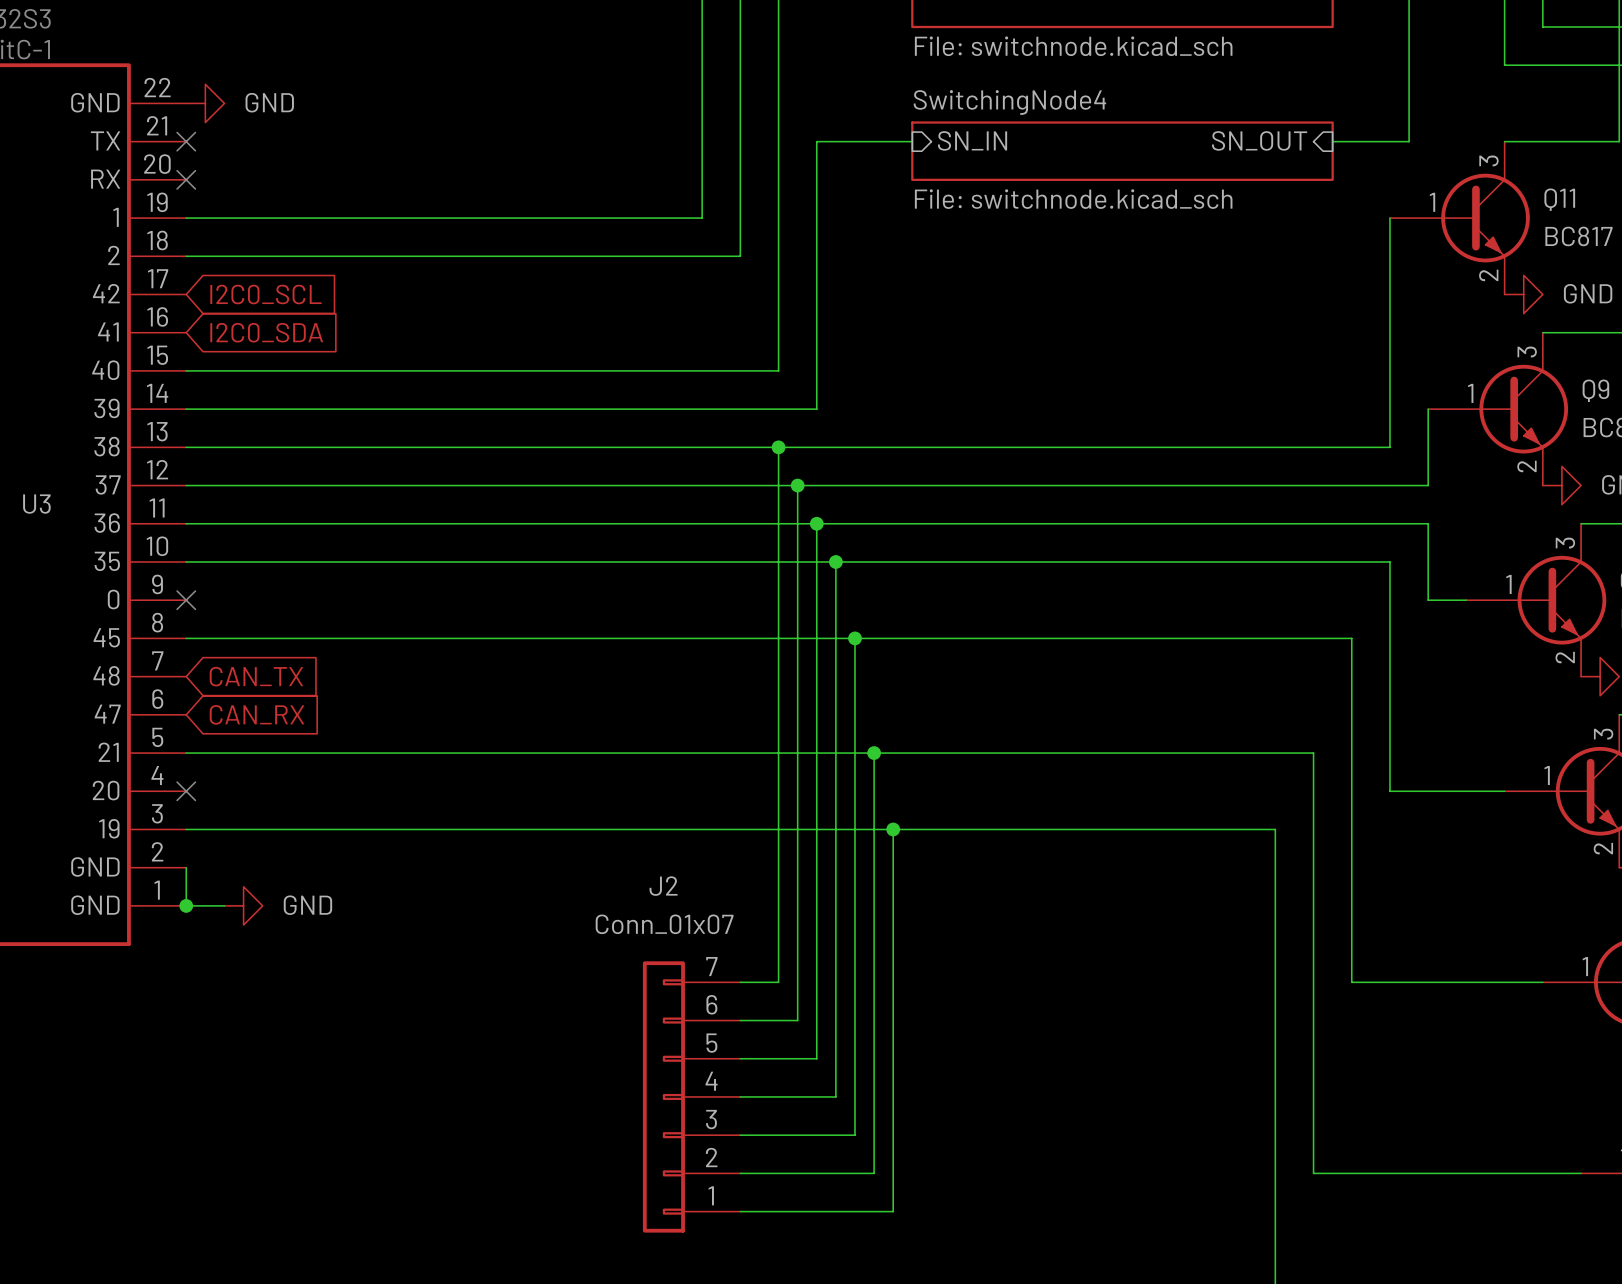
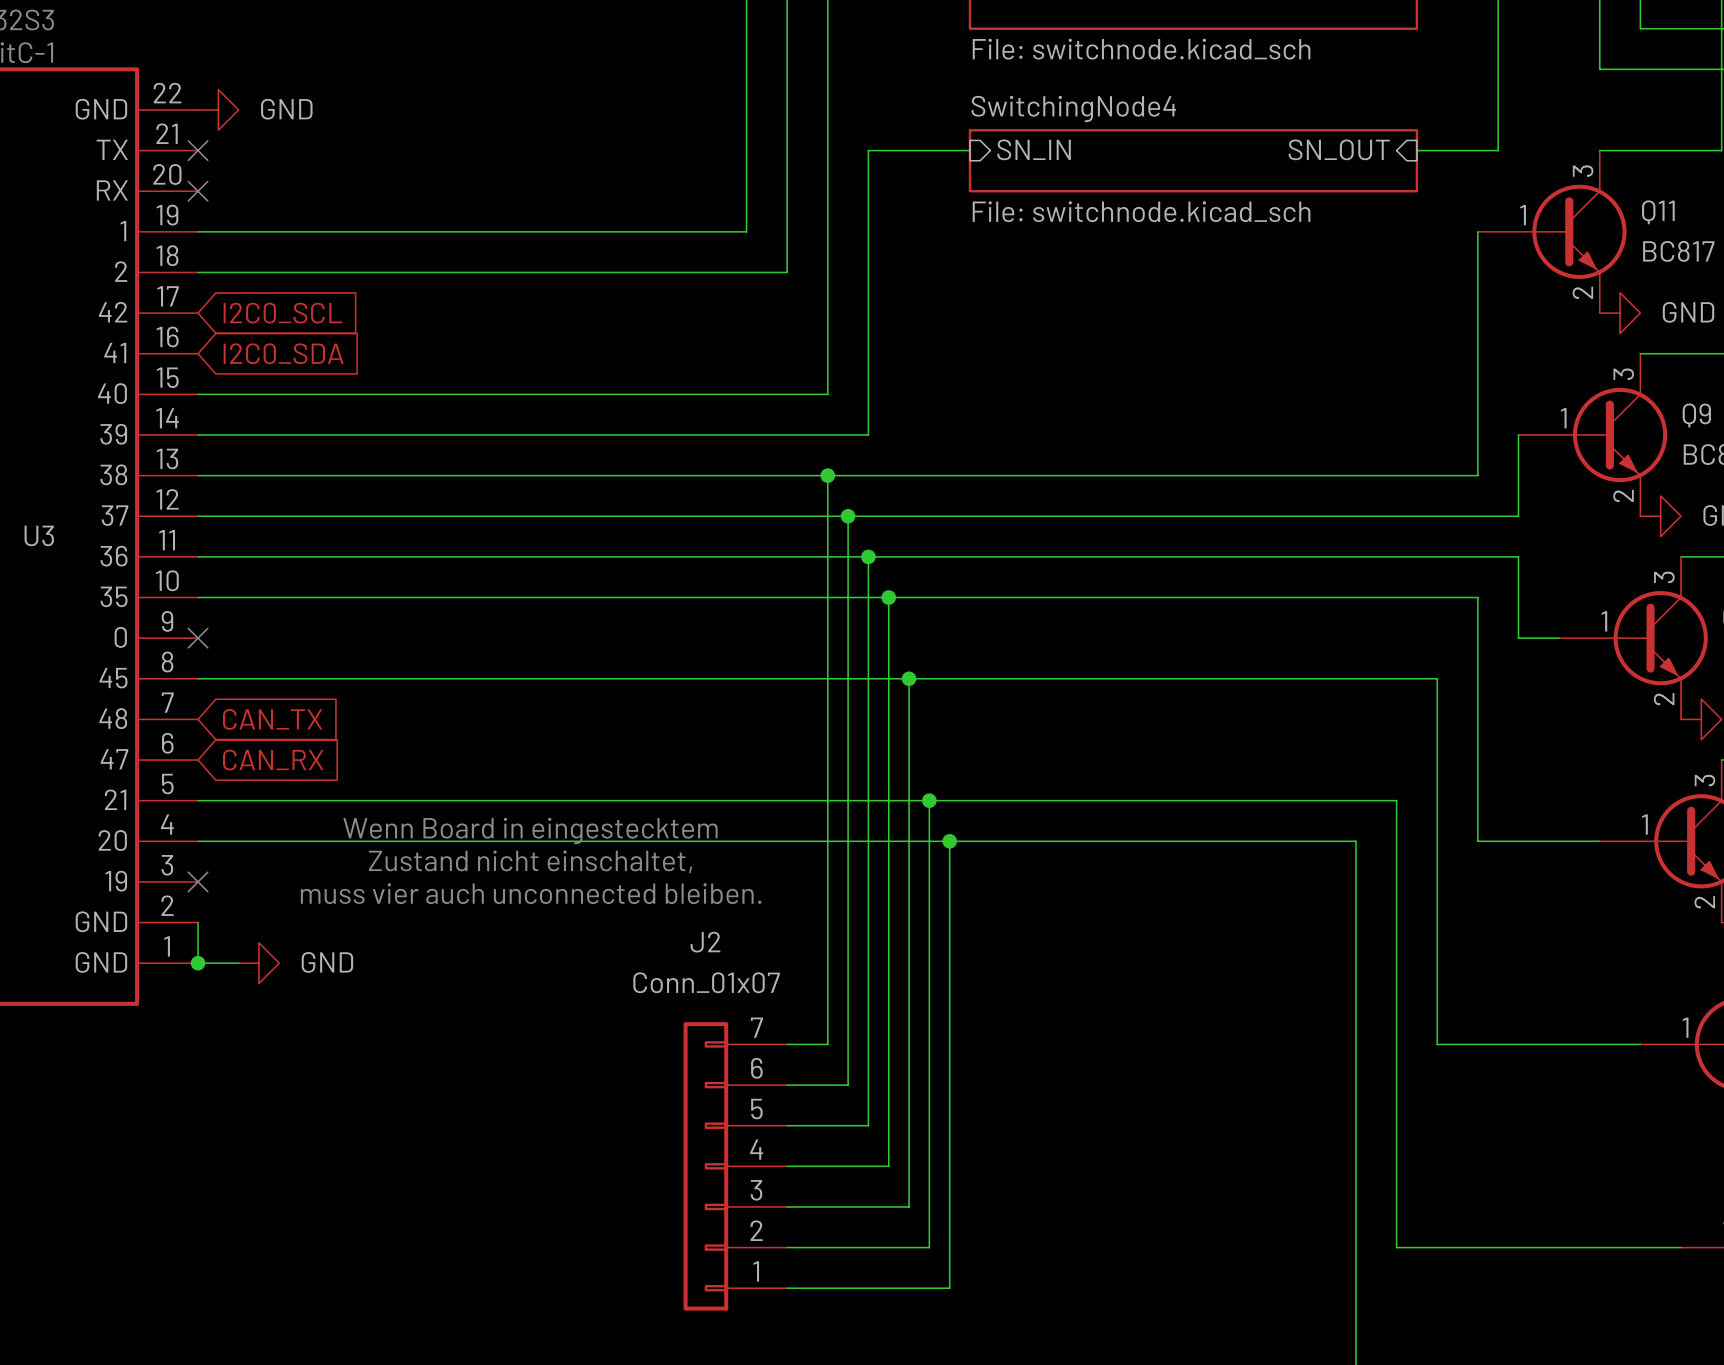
text: none -> Wenn Board in eingestecktem (530, 830)
no-connect mark position: (186, 791) -> (198, 881)
wire: none -> (949, 841) (949, 881)
text: none -> Zustand nicht einschaltet, (530, 861)
wire: (186, 829) (1275, 829) -> (198, 841) (1355, 841) (1355, 881)
junction position: (893, 829) -> (949, 841)
text: none -> muss vier auch unconnected bleiben. (531, 893)

